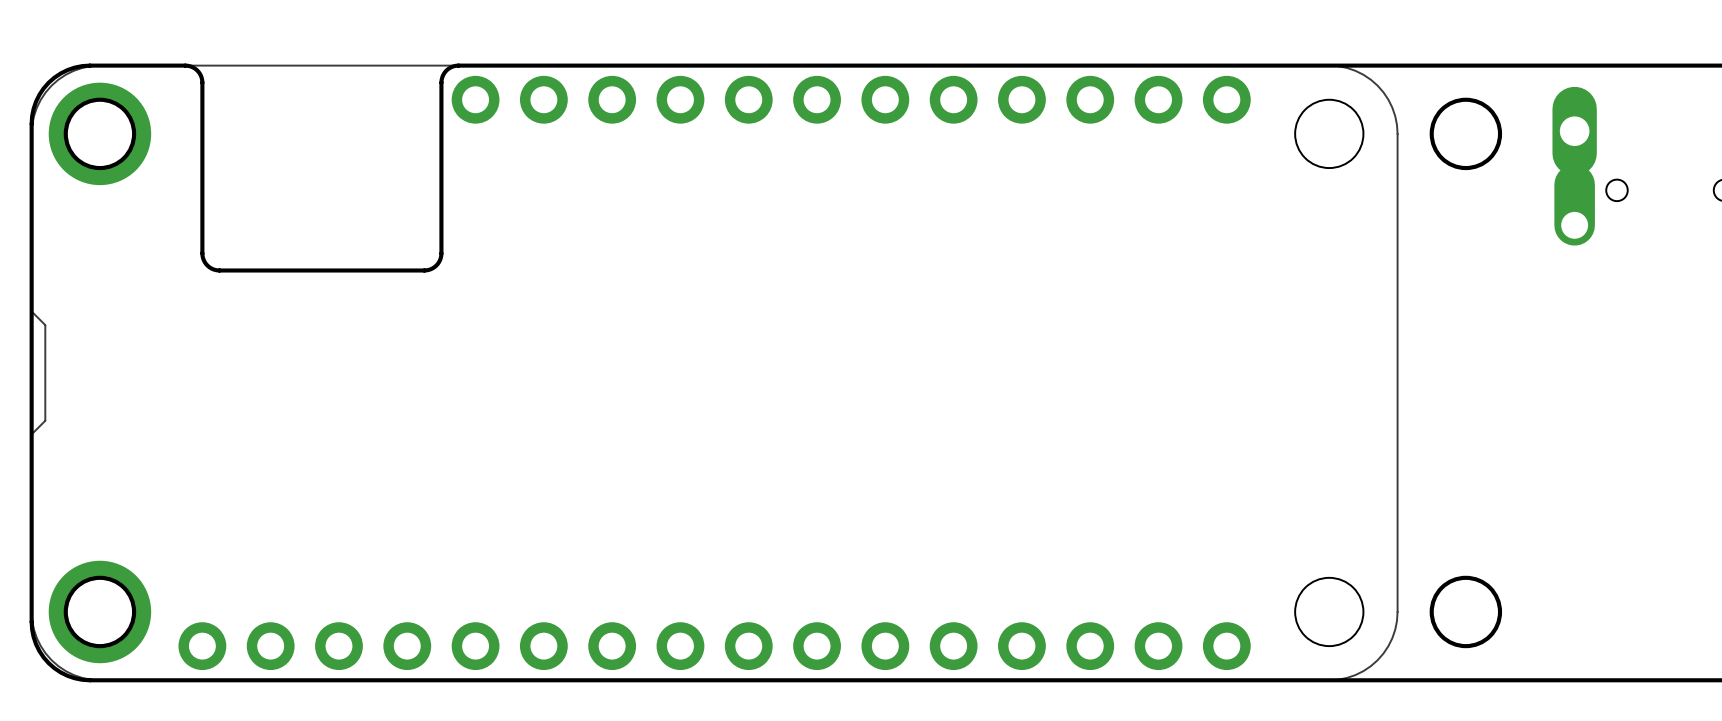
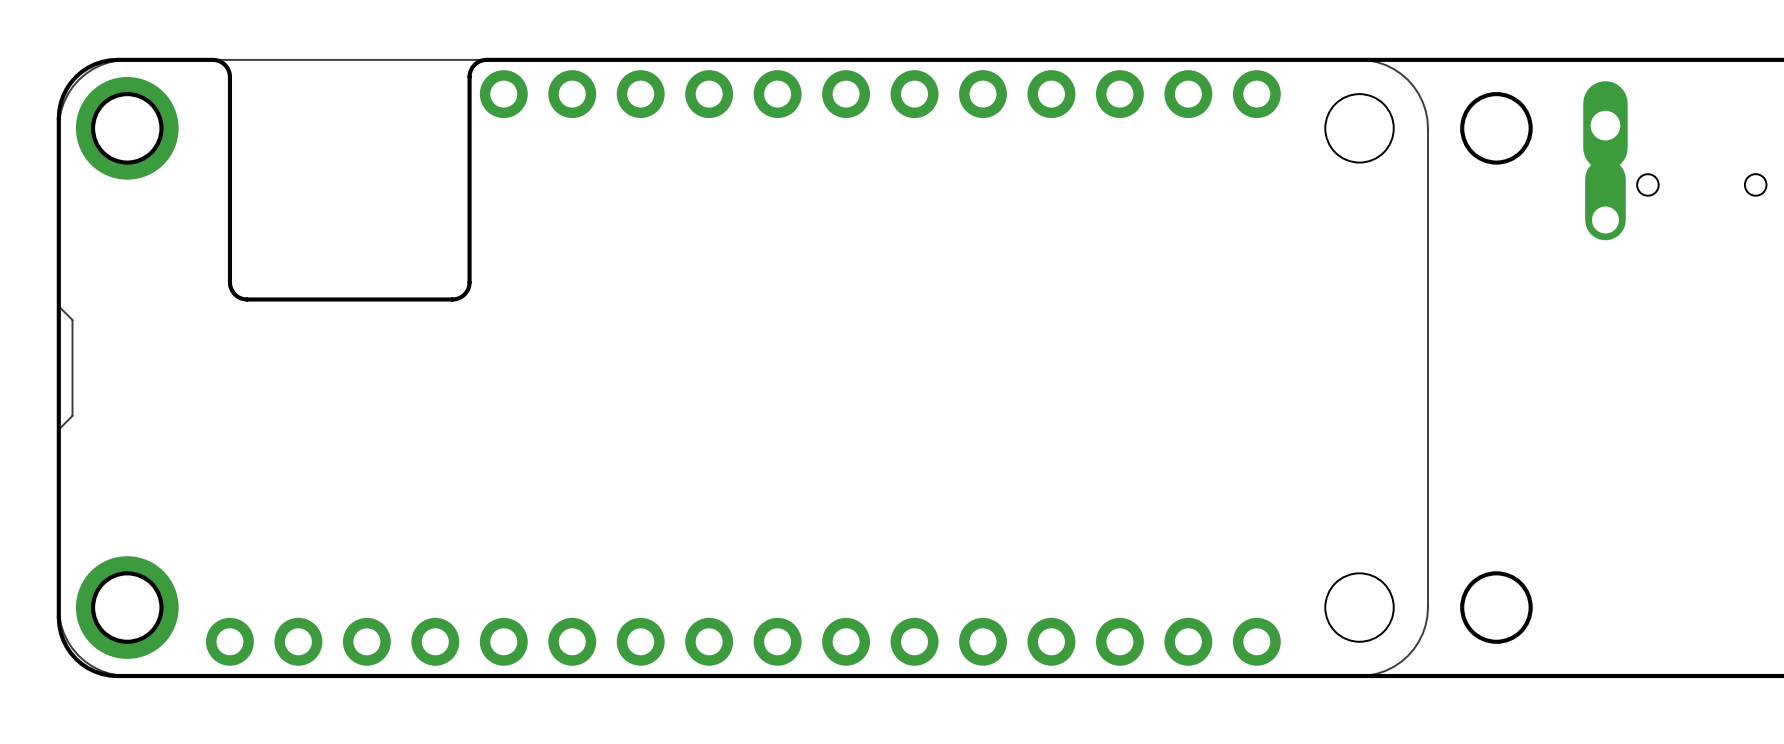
board edge: (441, 253) (436, 265) (424, 270) (217, 270) (205, 263) (202, 253) -> (469, 248) (468, 286) (462, 295) (452, 299) (242, 298) (234, 294) (230, 286) (229, 248)

